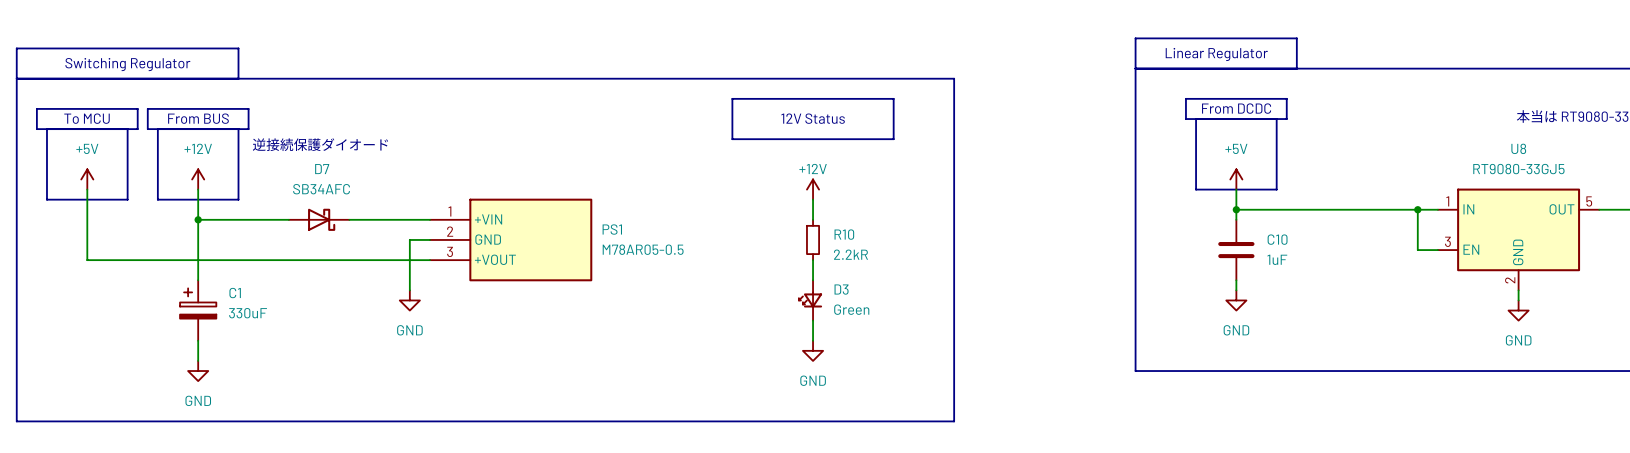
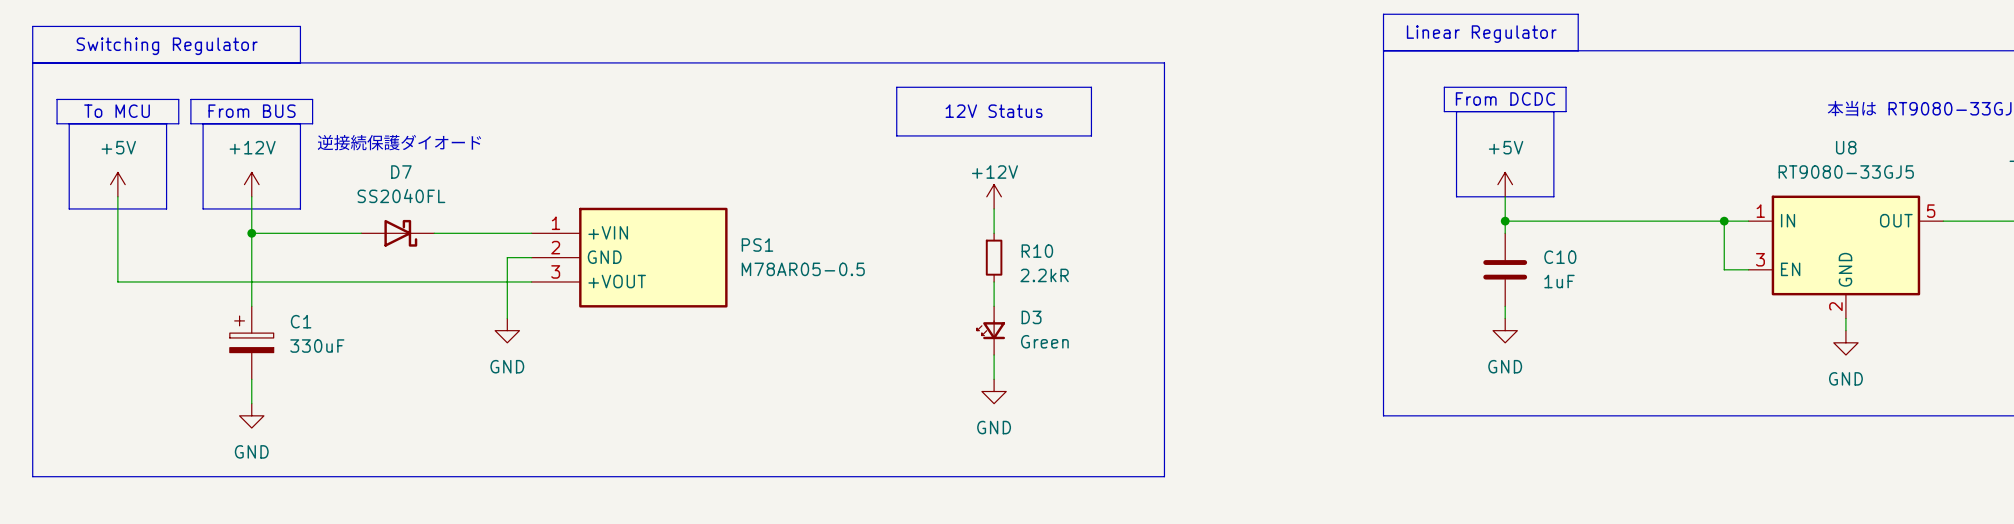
D7 value: SB34AFC (321, 189) -> SS2040FL (401, 196)

